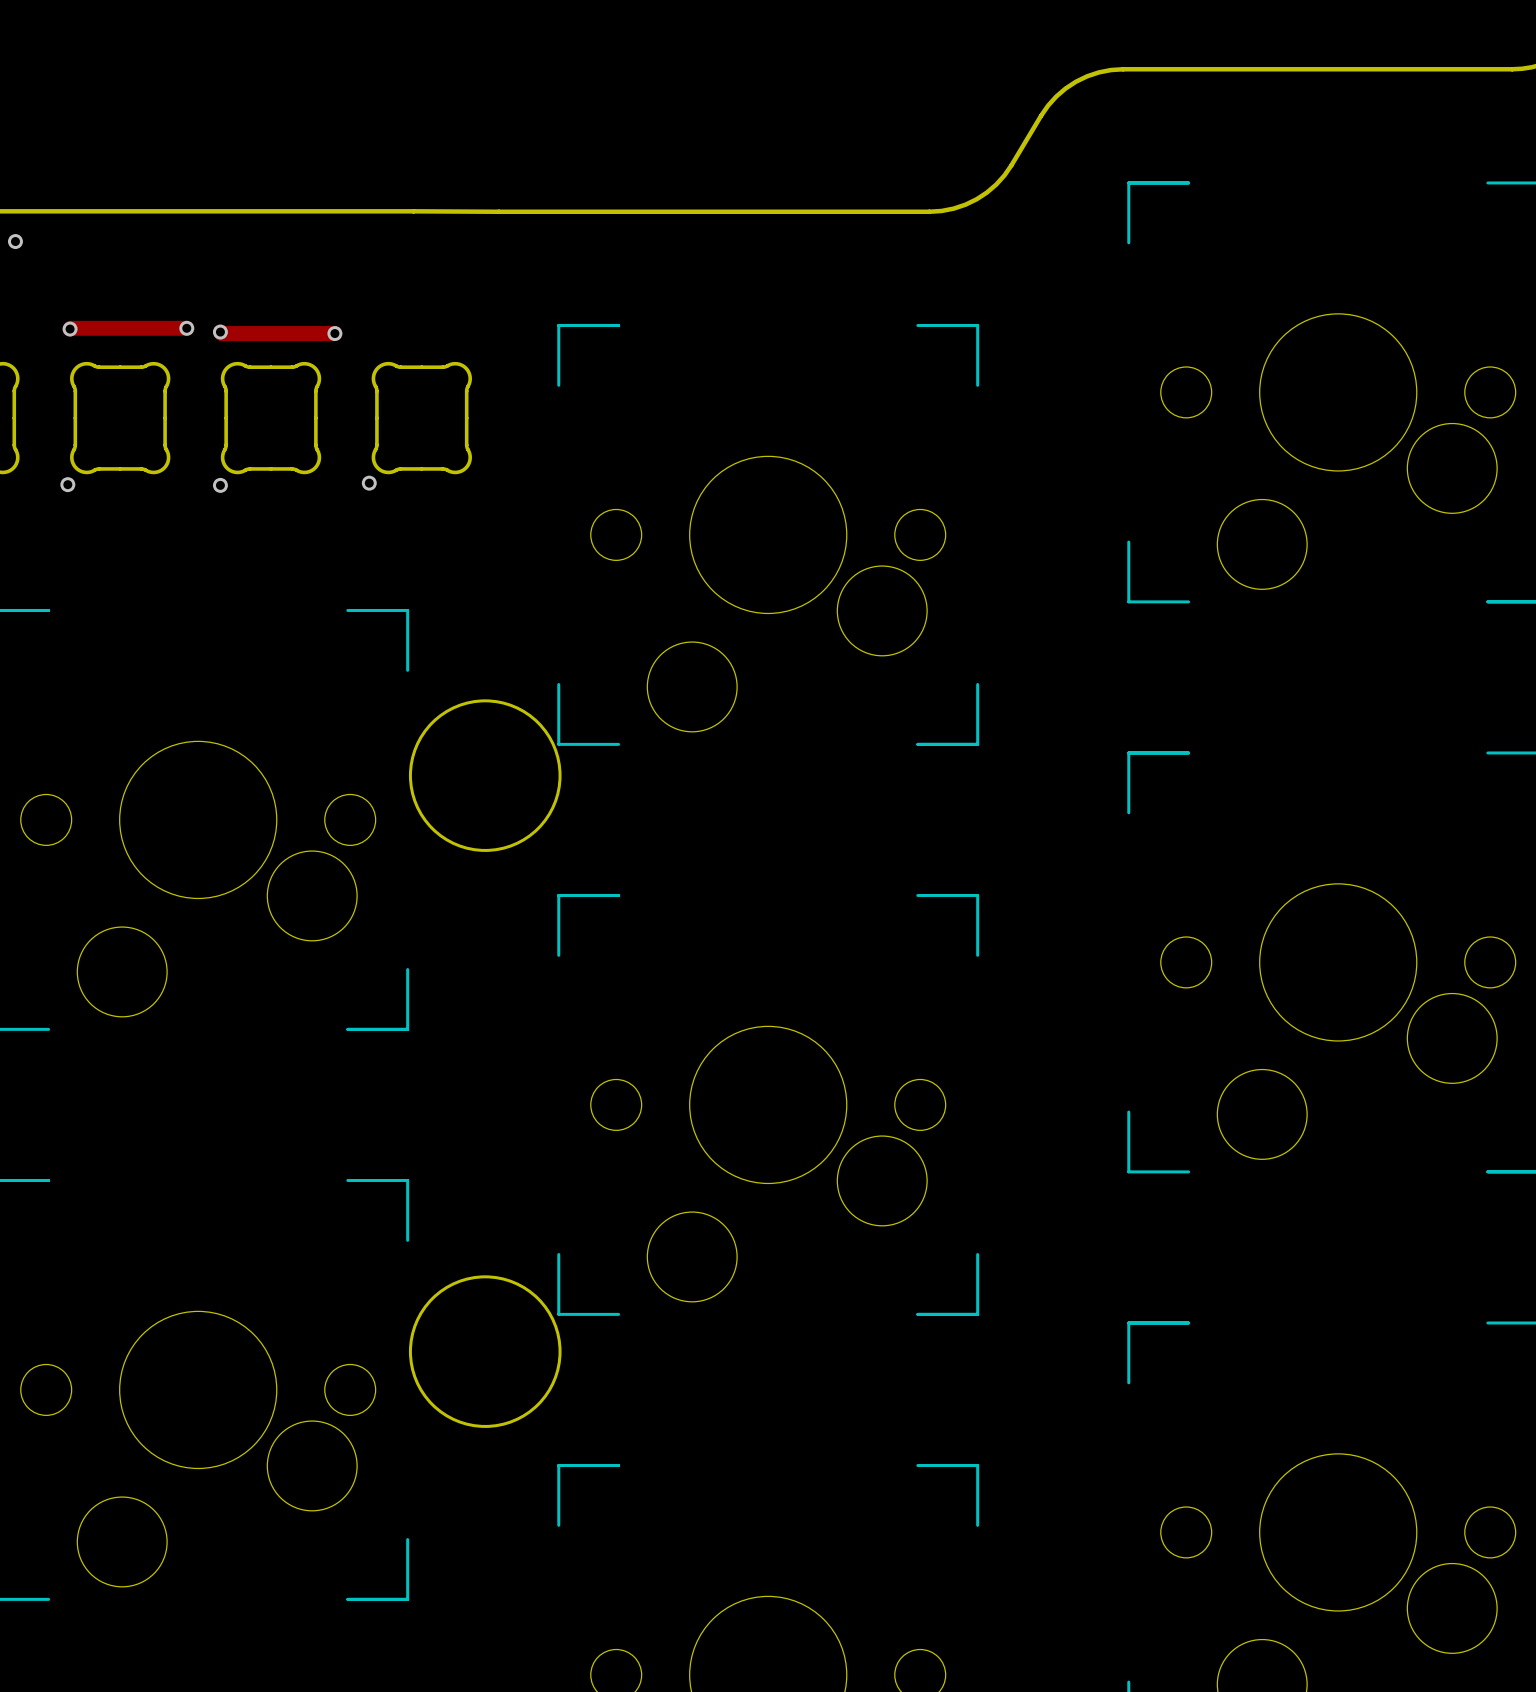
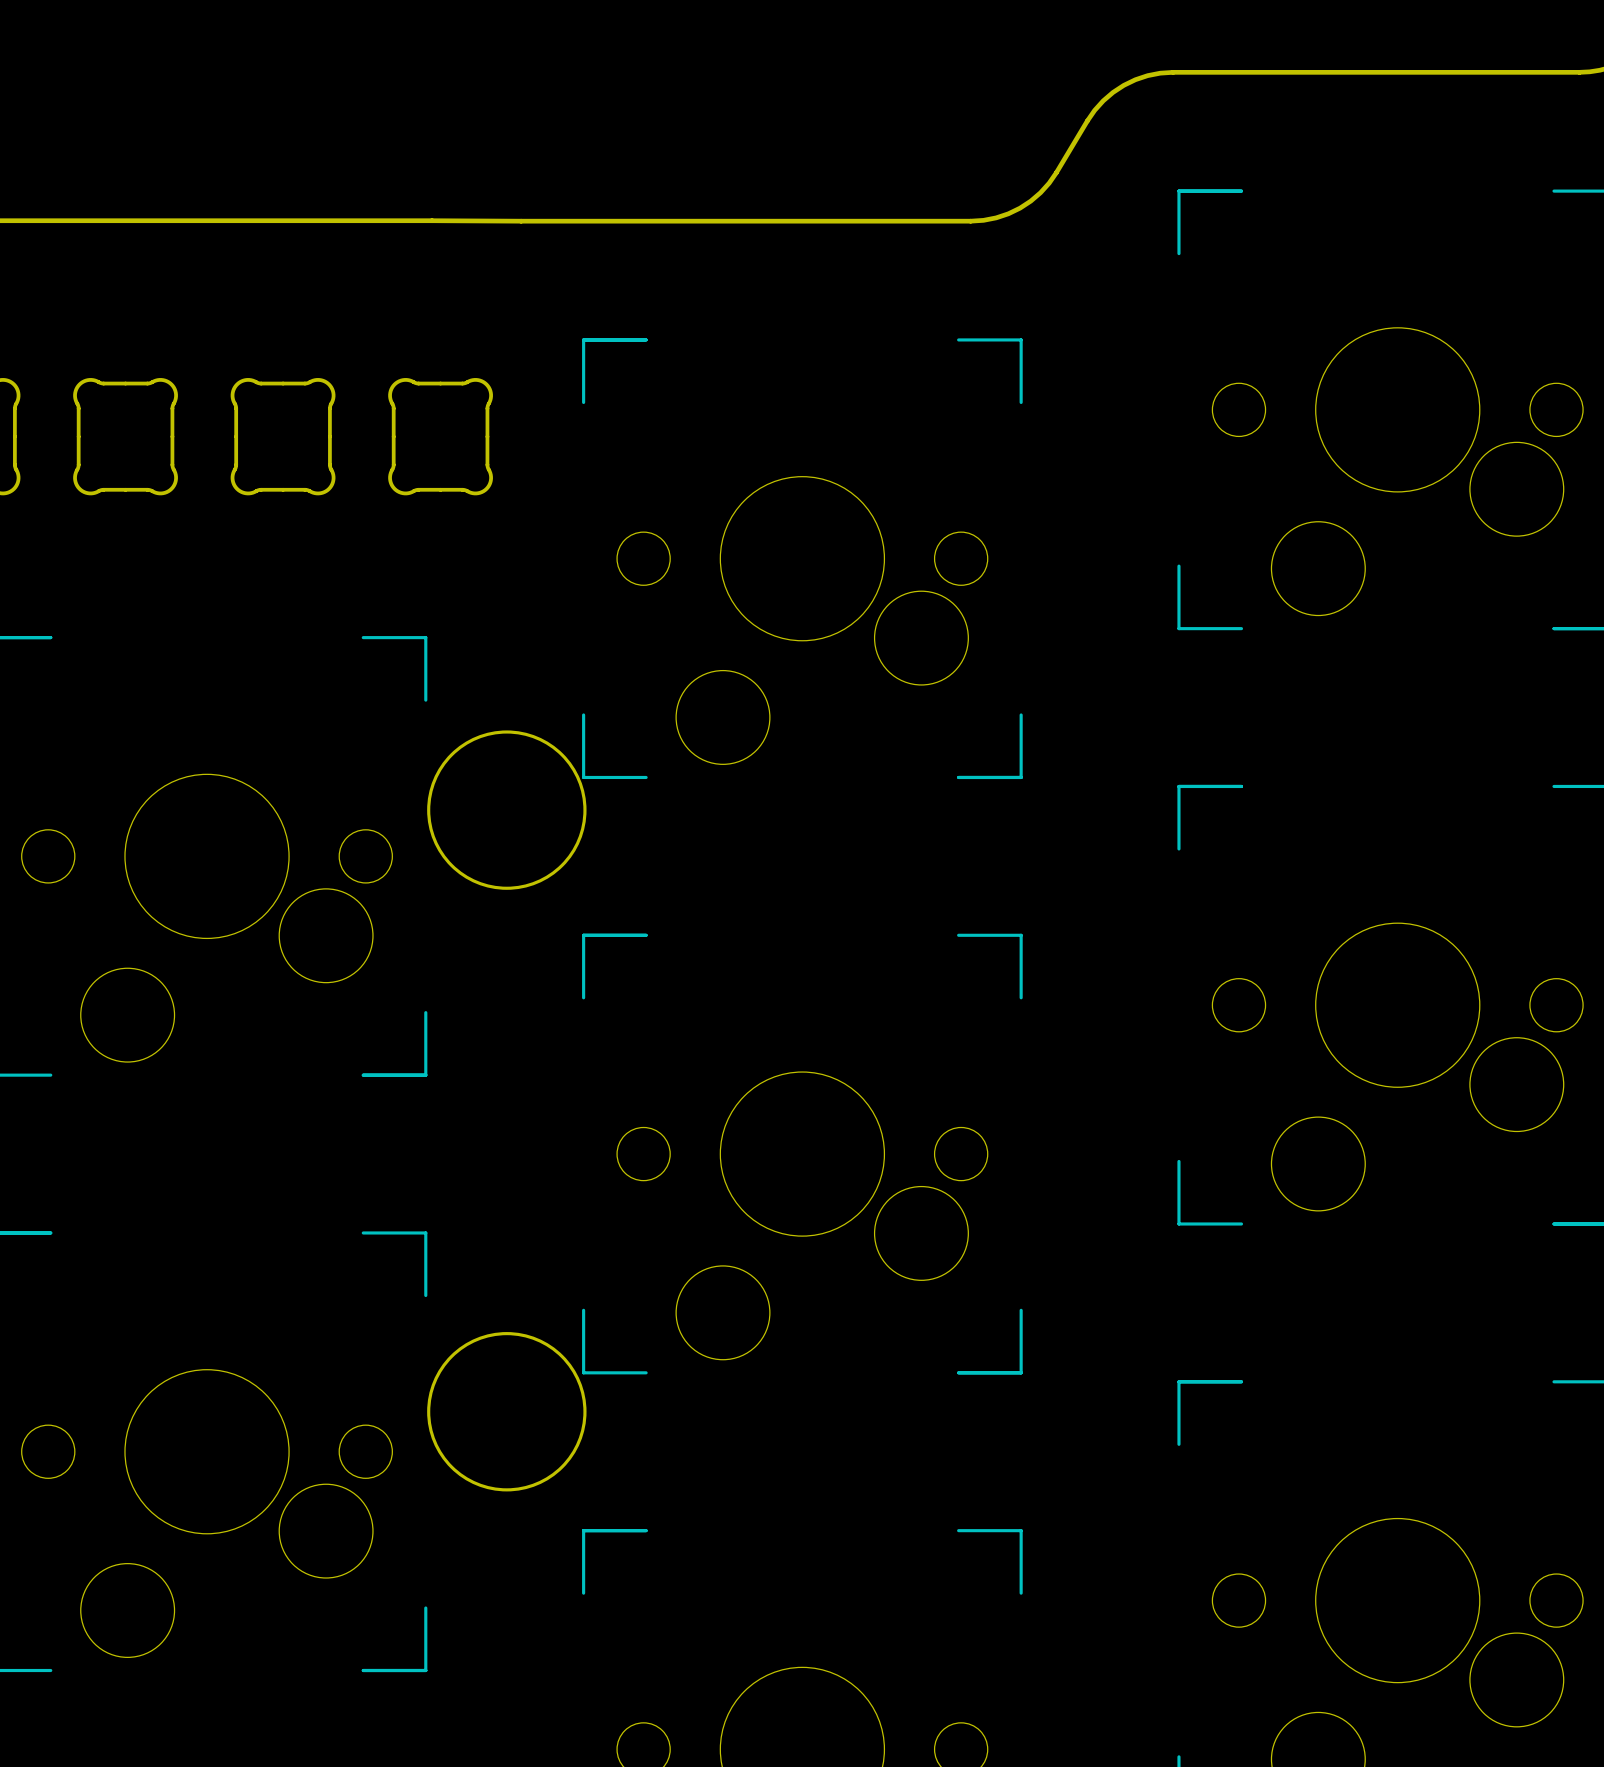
via: (15, 241) -> none
track: (186, 328) (70, 329) -> none
via: (186, 328) -> none
via: (70, 329) -> none
track: (220, 332) (334, 333) -> none
via: (220, 332) -> none
via: (334, 333) -> none
via: (369, 483) -> none
via: (67, 484) -> none
via: (220, 485) -> none

